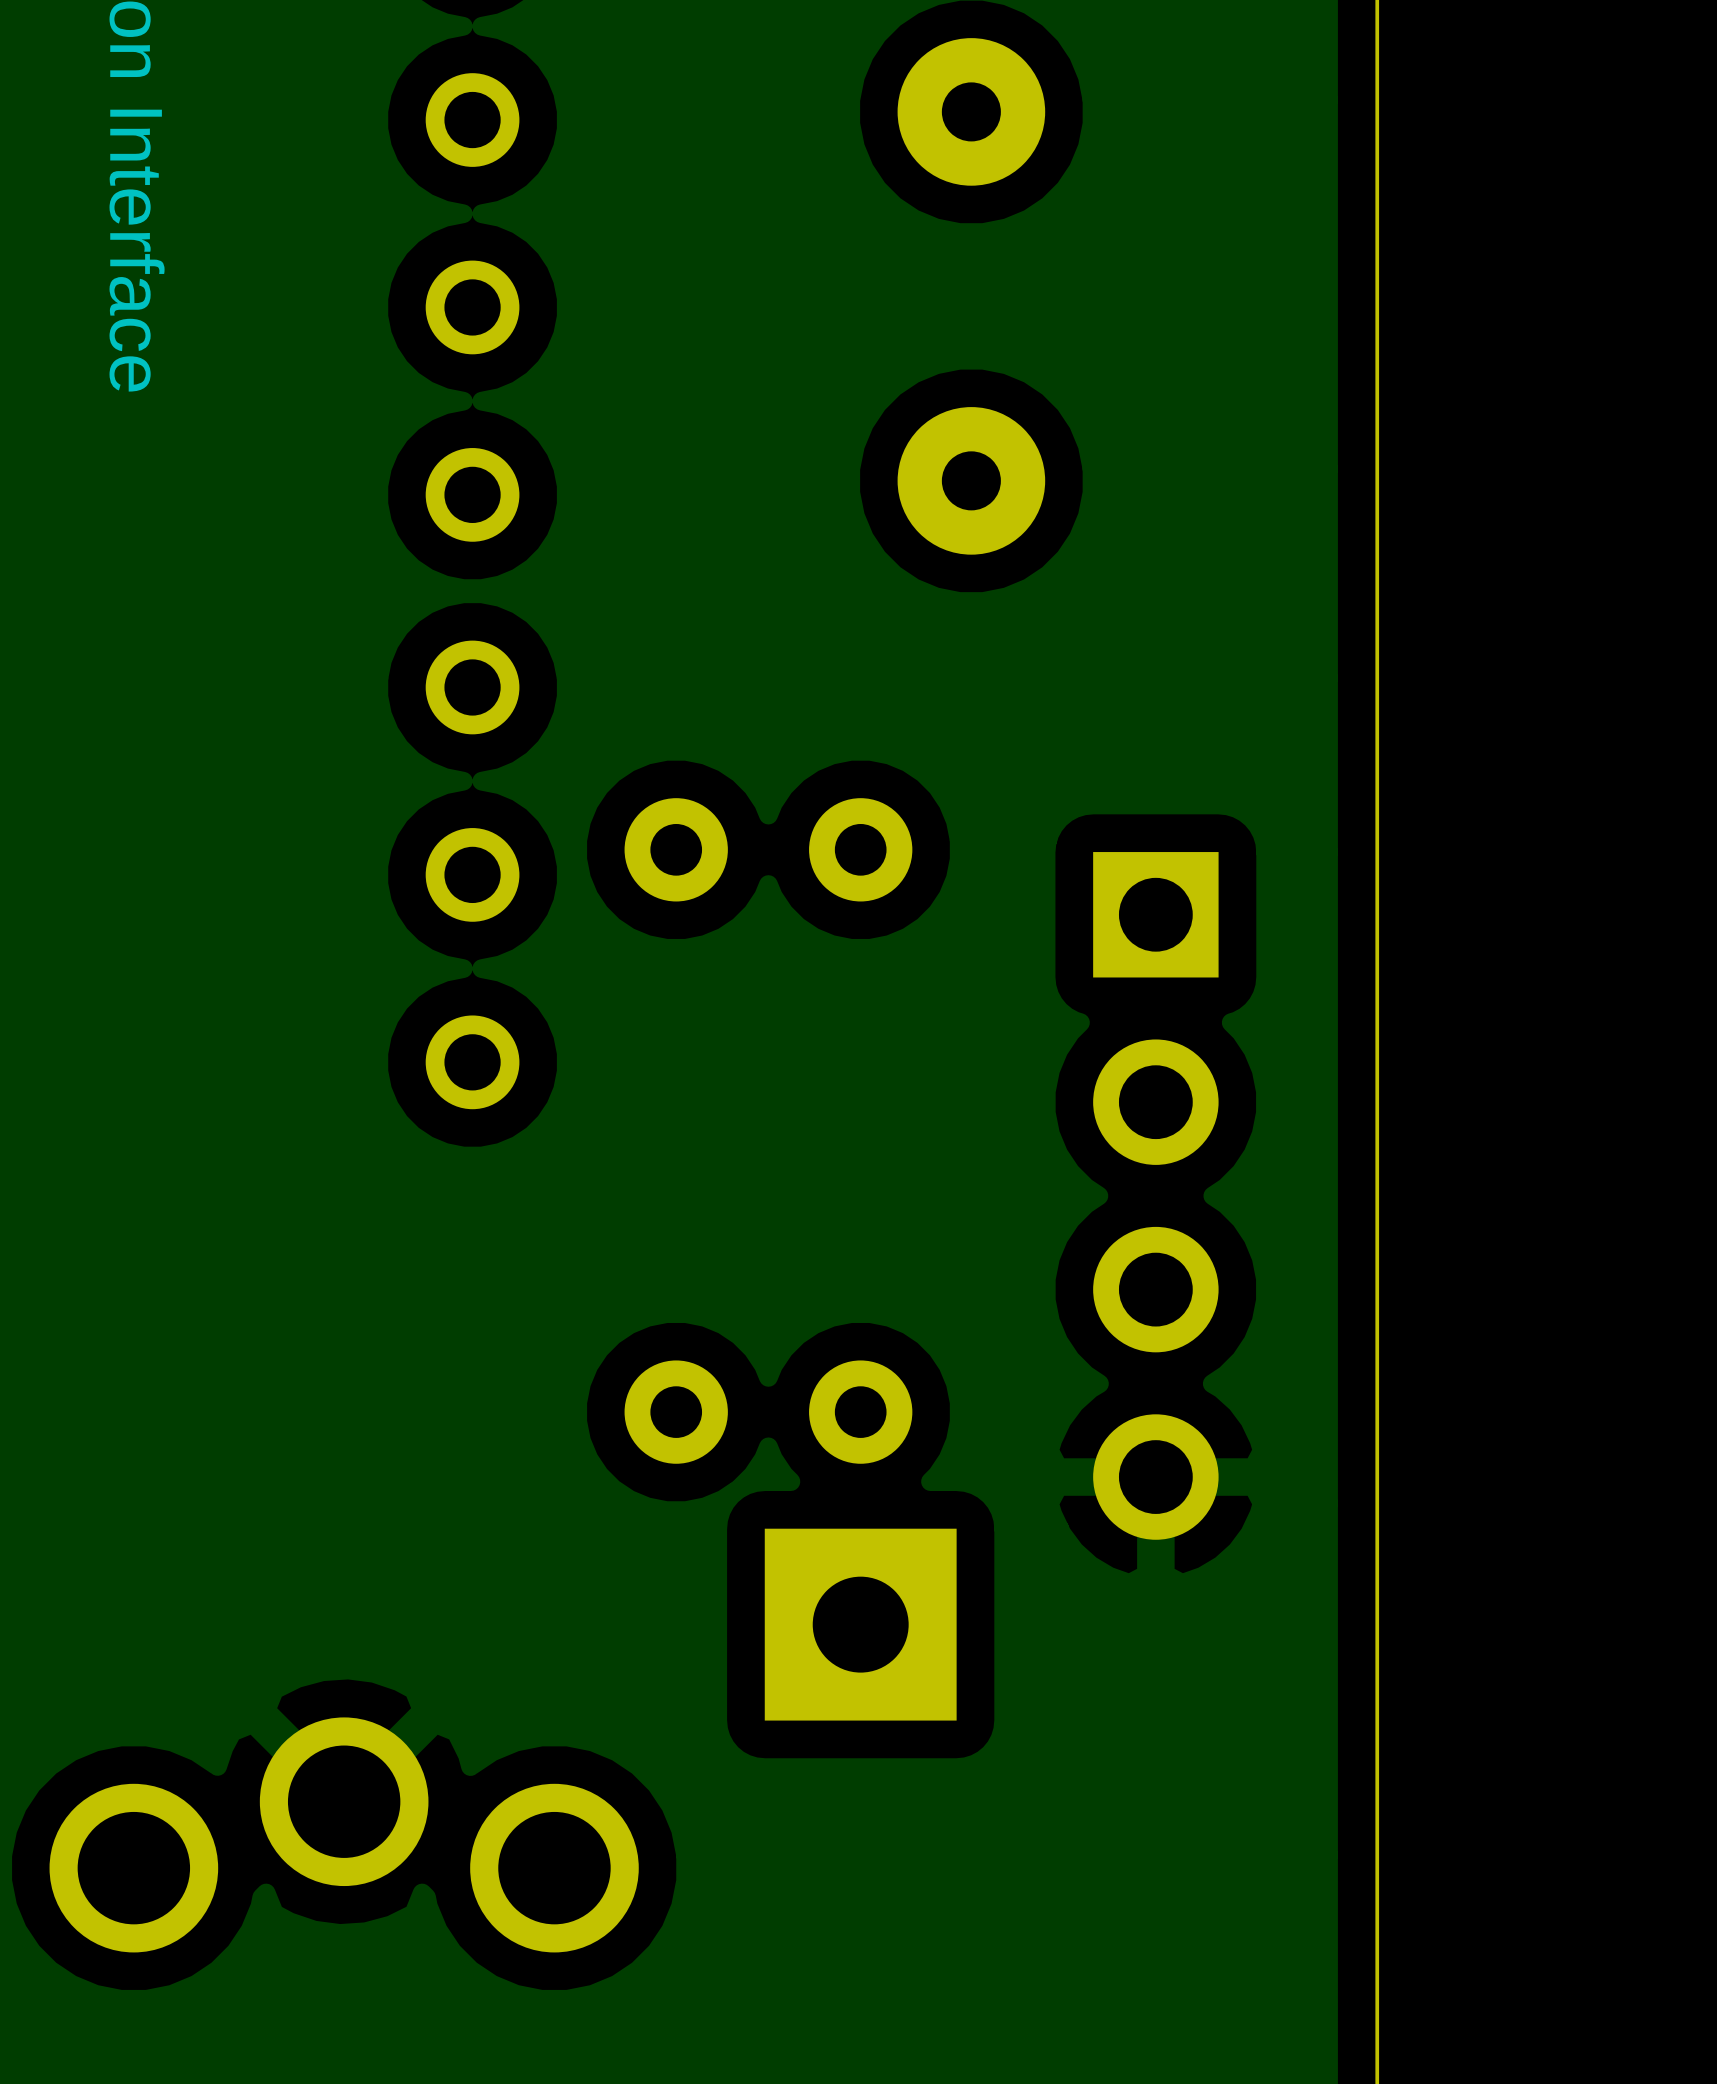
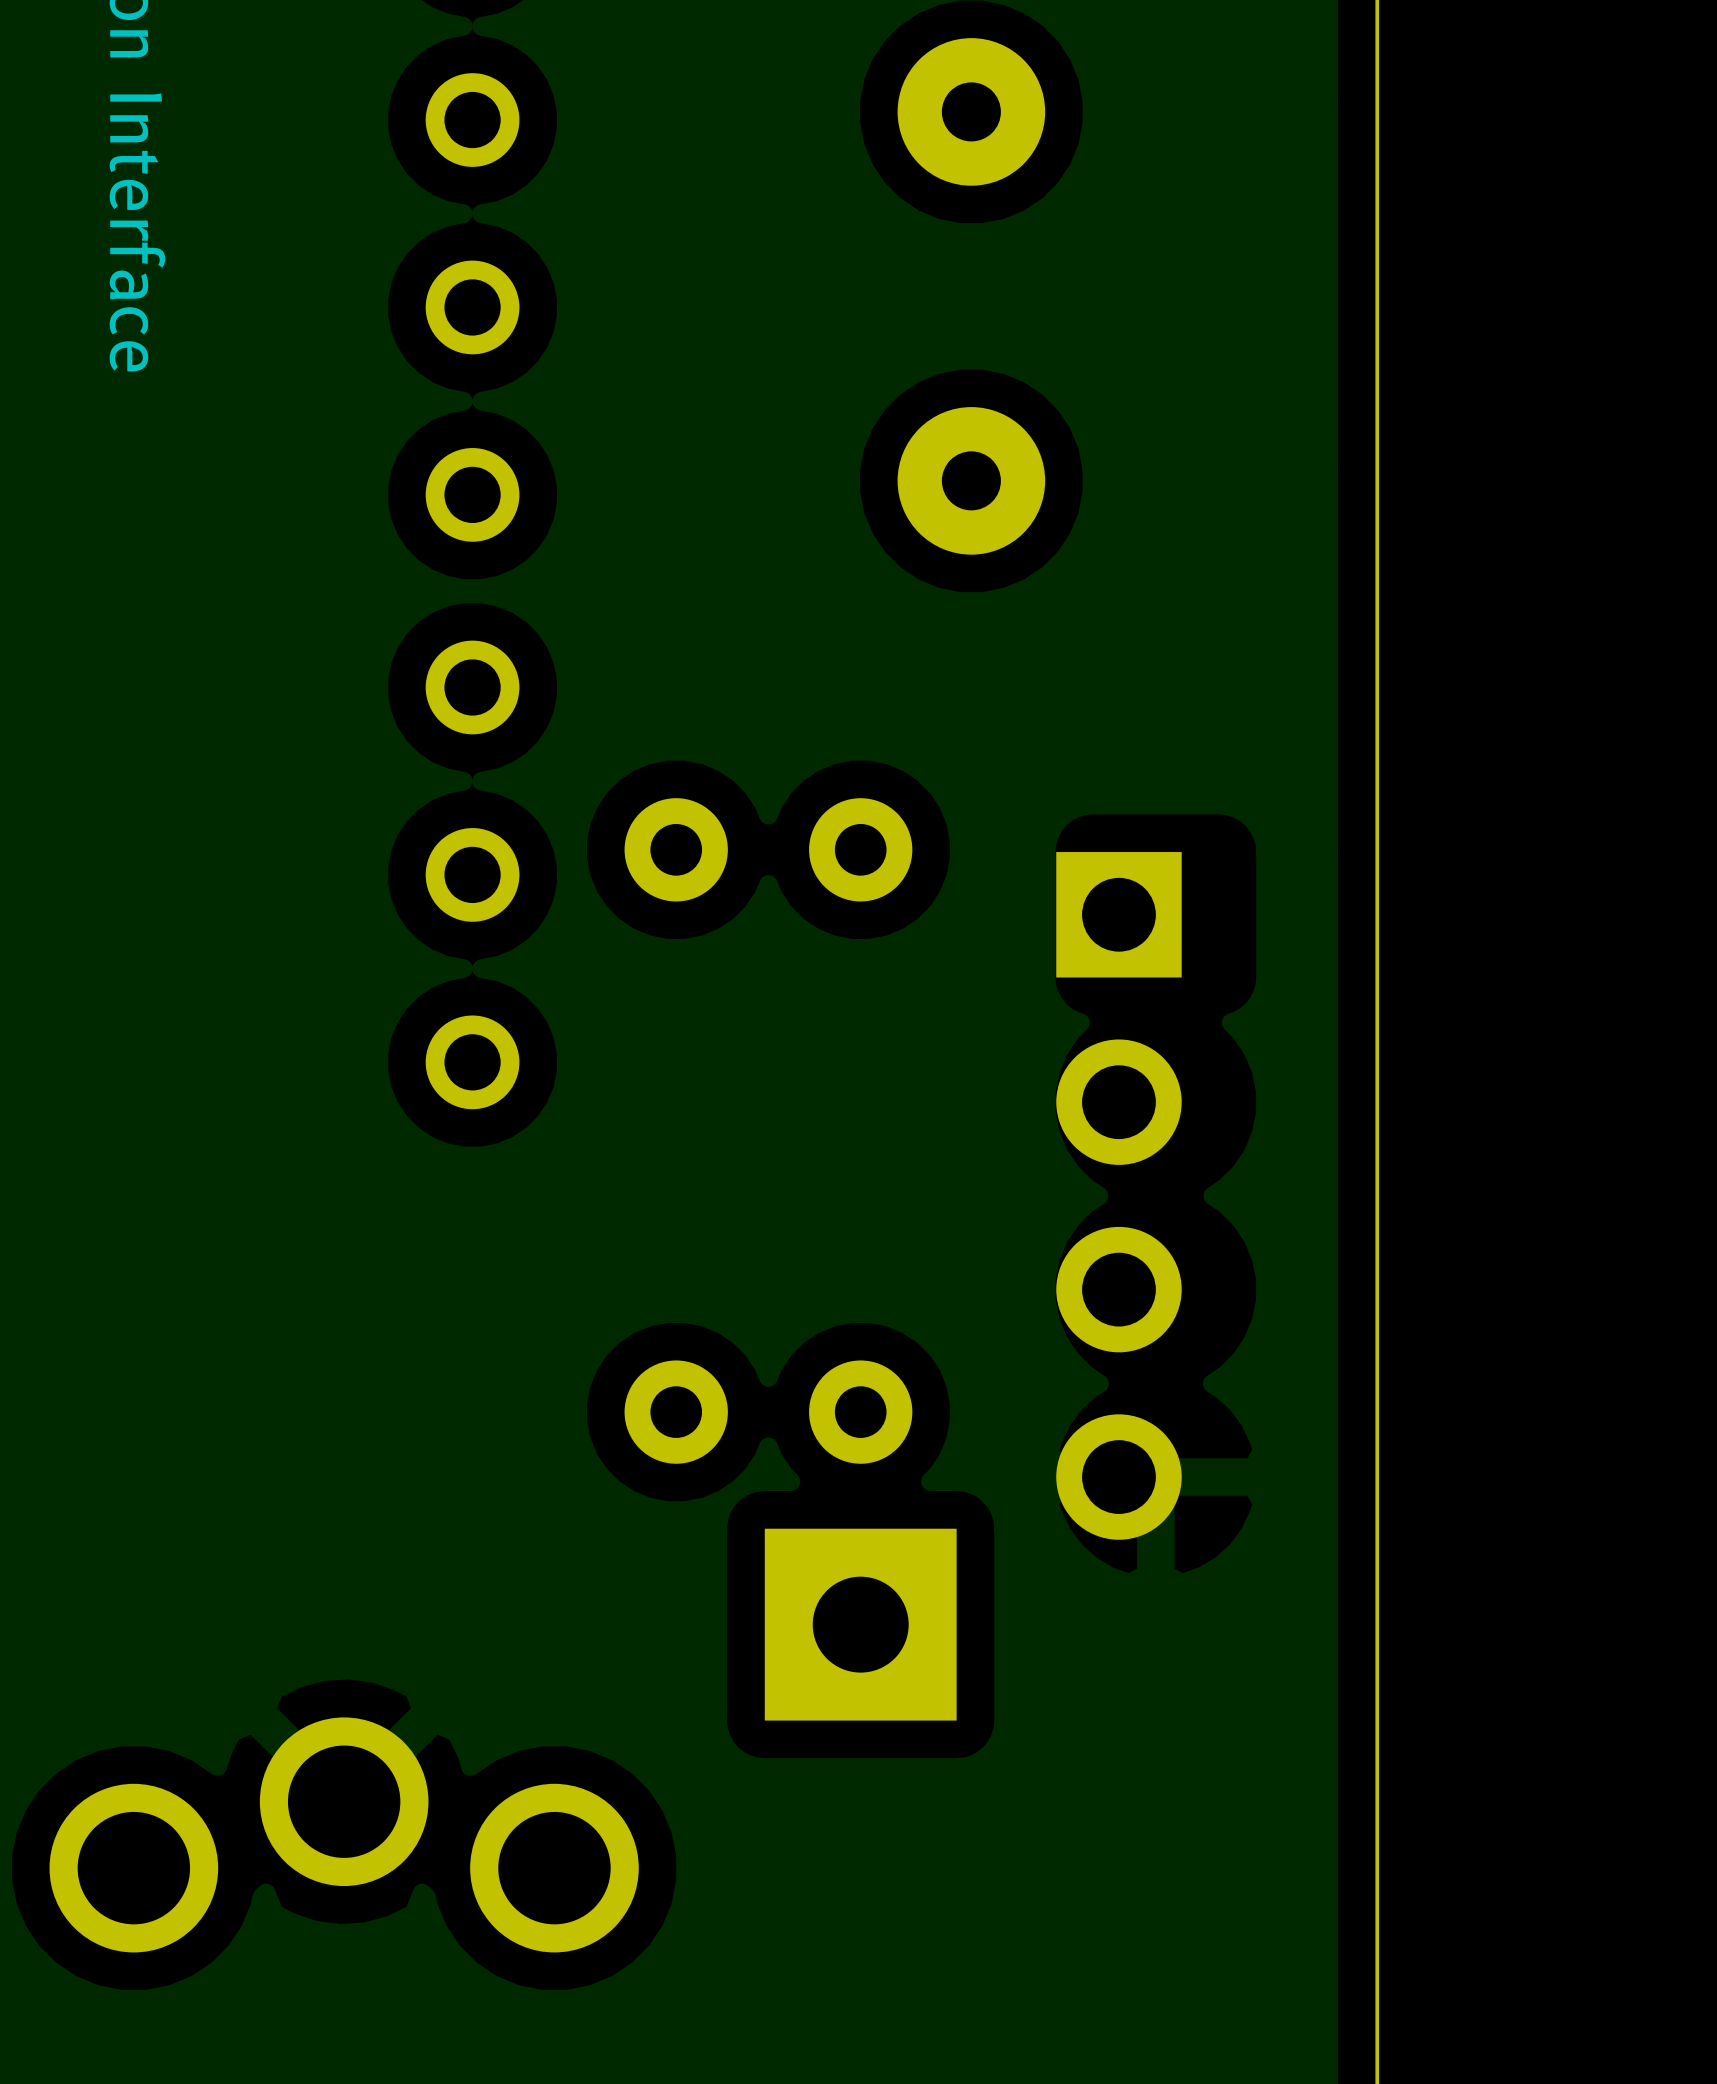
part position: (1155, 1195) -> (1118, 1195)

